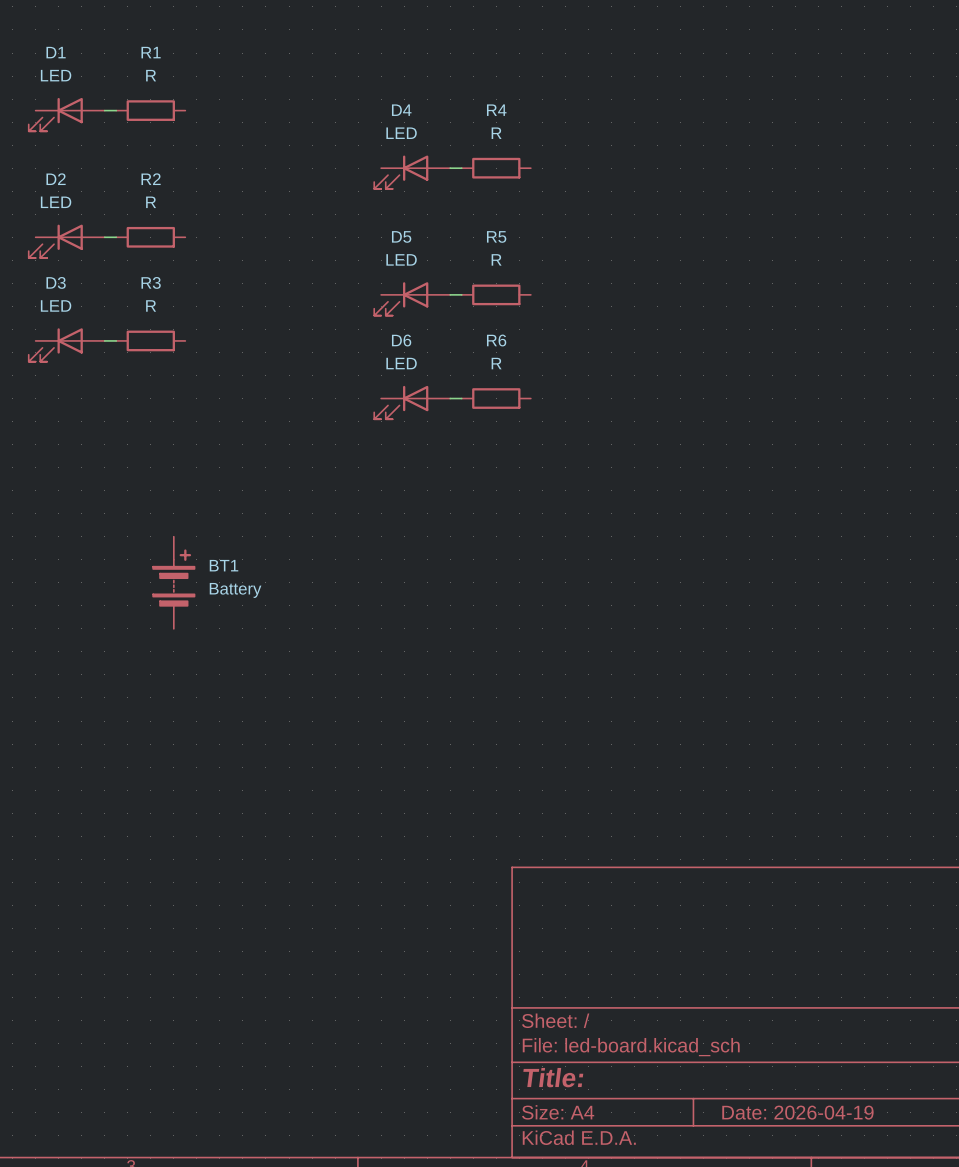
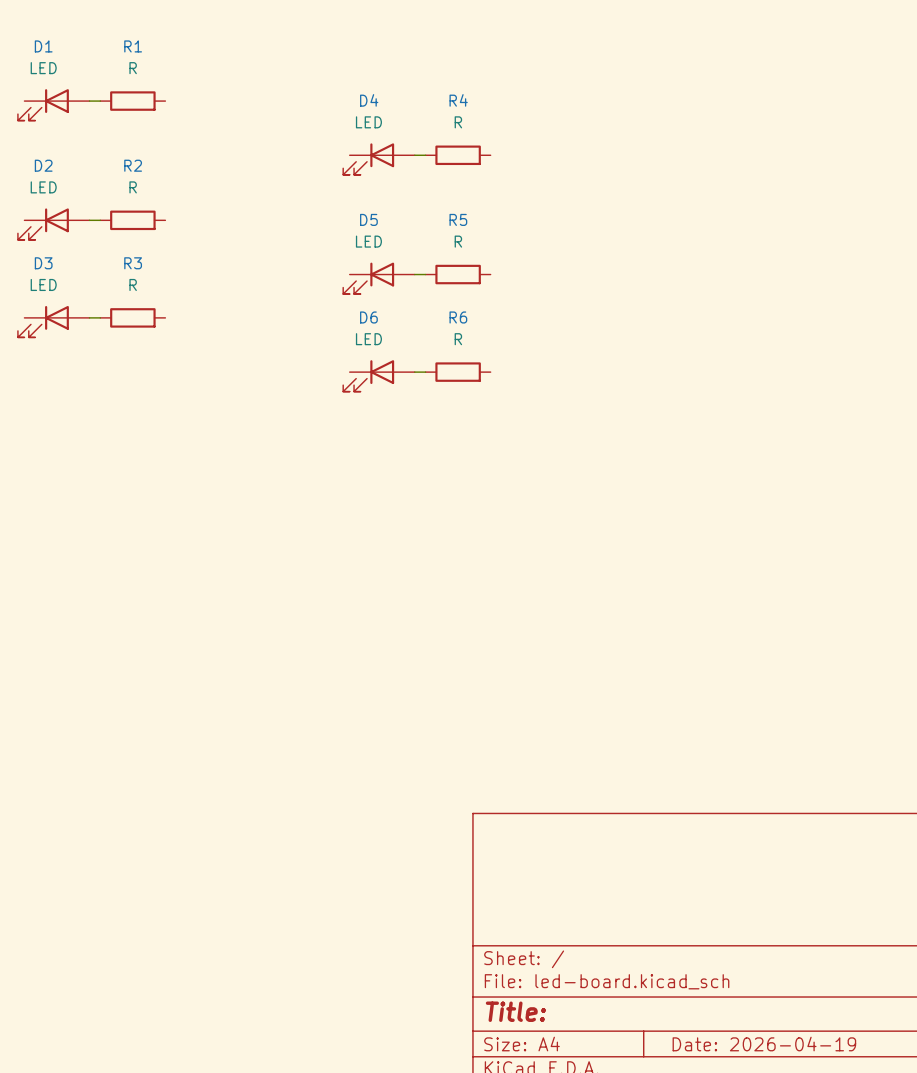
BT1: Battery (173, 582) -> none

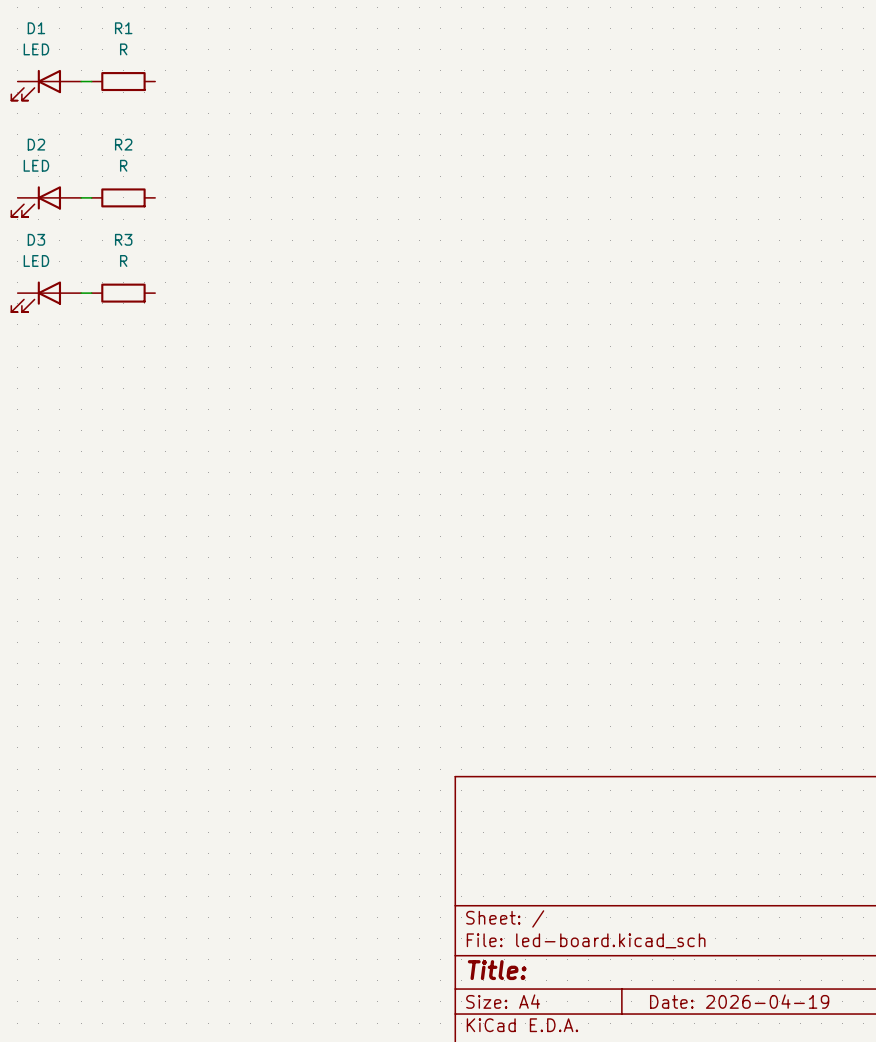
wire: (414, 155) (425, 155) -> none
R4: R (458, 155) -> none
D4: LED (378, 159) -> none
wire: (414, 274) (425, 274) -> none
R5: R (458, 274) -> none
D5: LED (378, 278) -> none
wire: (414, 372) (425, 372) -> none
R6: R (458, 372) -> none
D6: LED (378, 375) -> none

